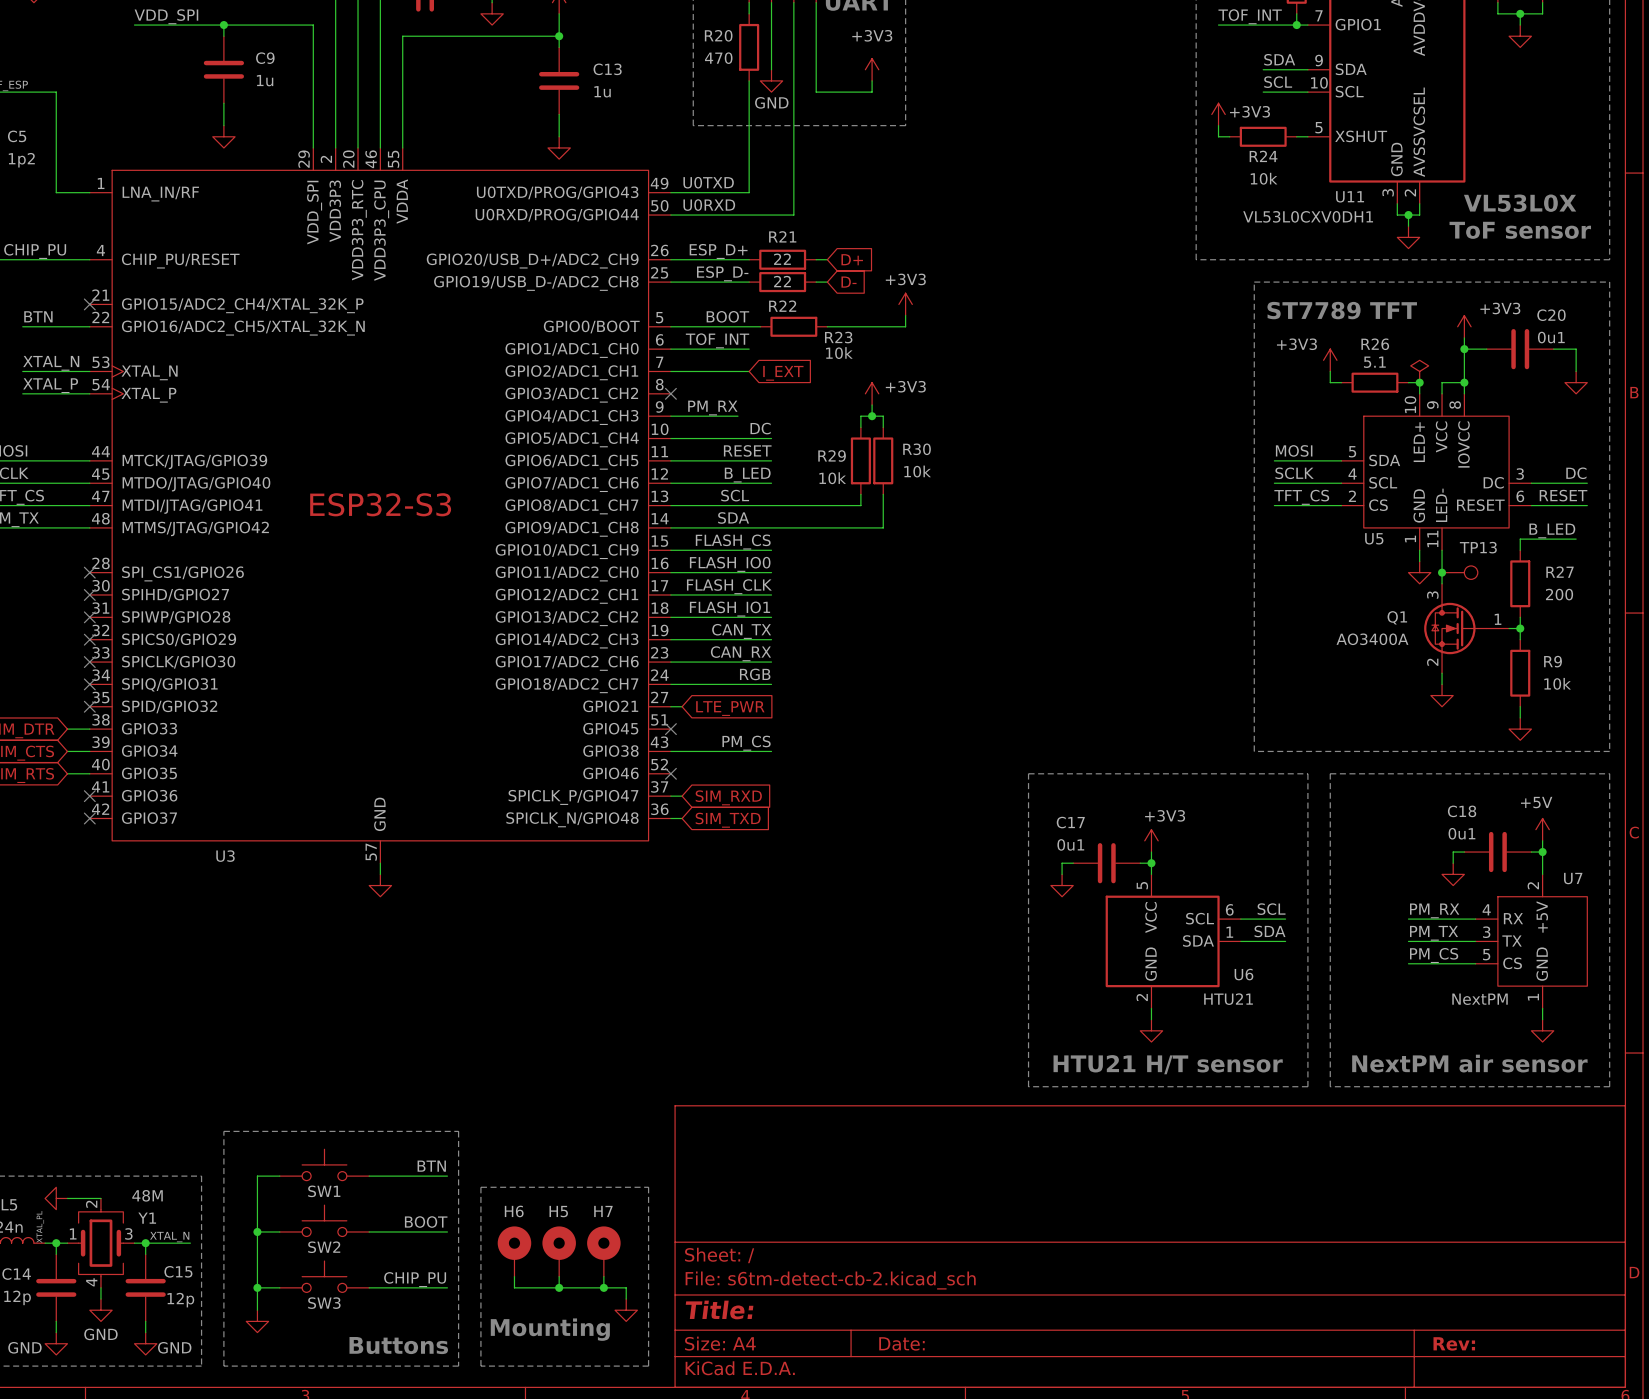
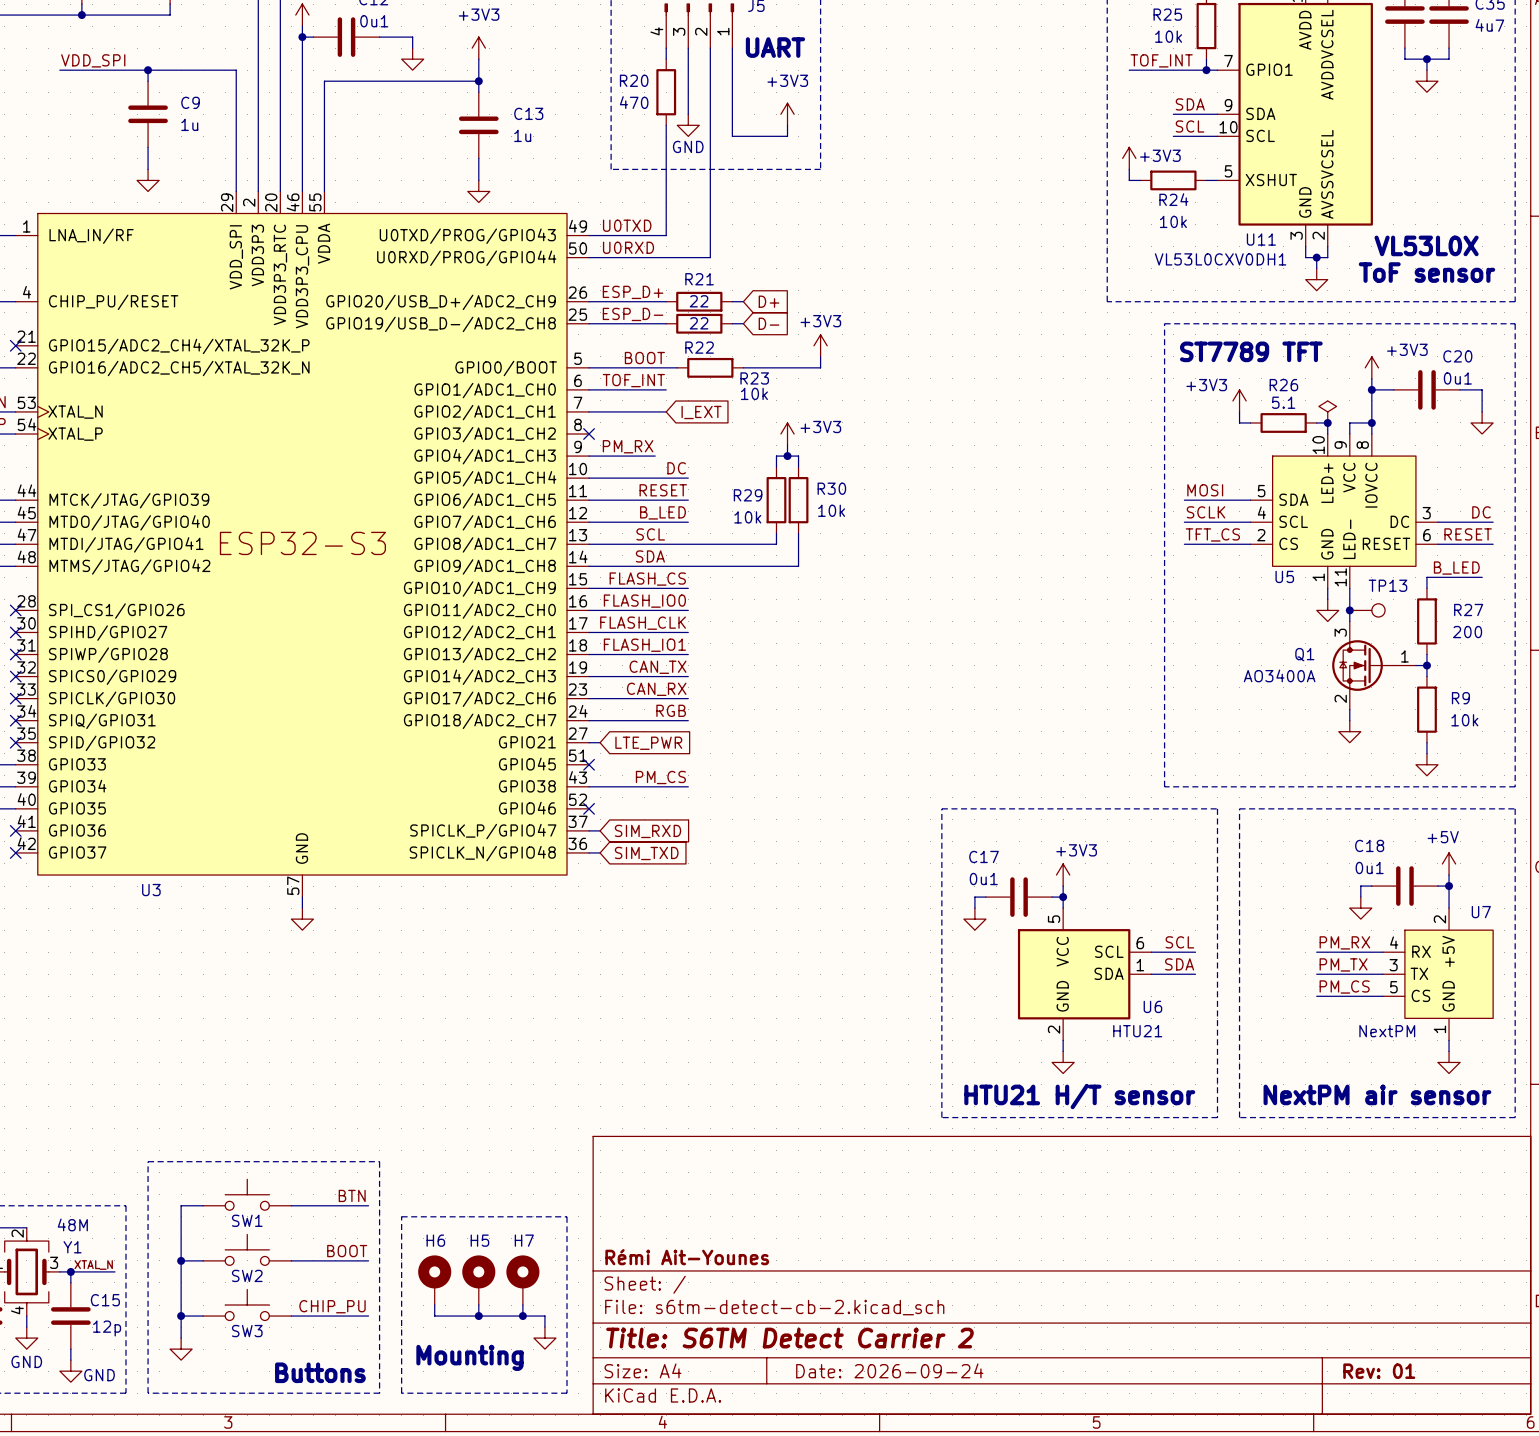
title block: none -> Rémi Ait-Younes (687, 1257)
title block: Title: (719, 1309) -> Title: S6TM Detect Carrier 2 (790, 1338)
title block: Date: (901, 1343) -> Date: 2026-09-24 (889, 1370)
title block: Rev: (1454, 1343) -> Rev: 01 (1379, 1371)

